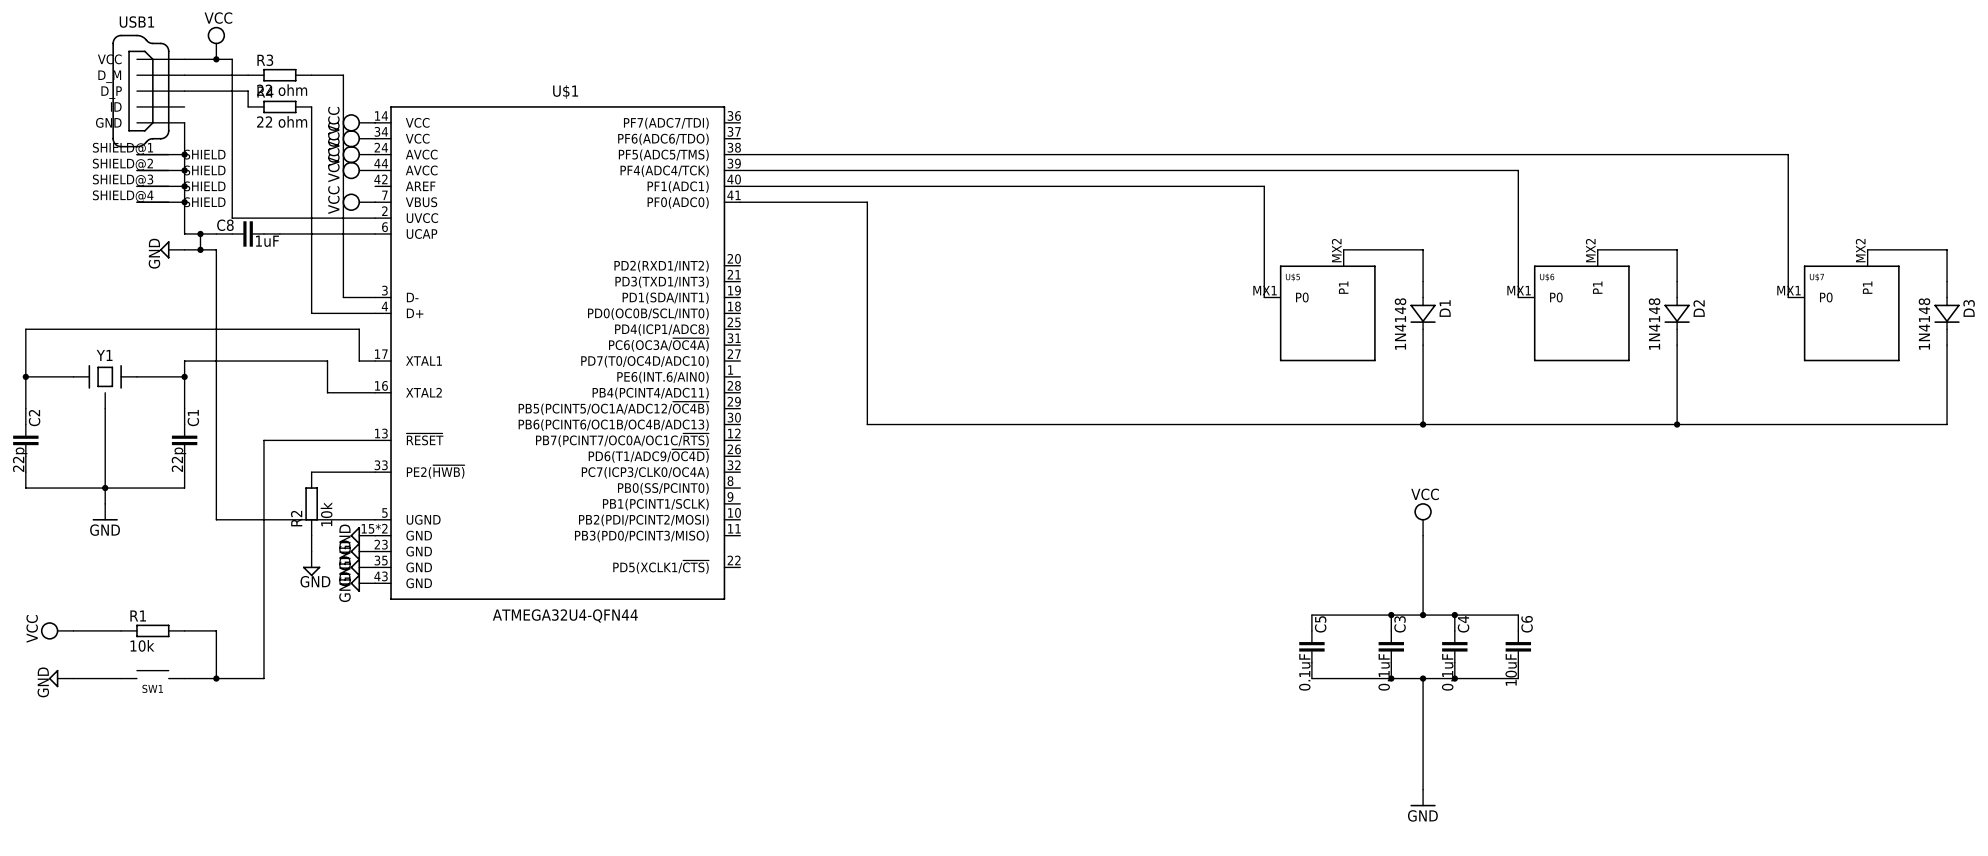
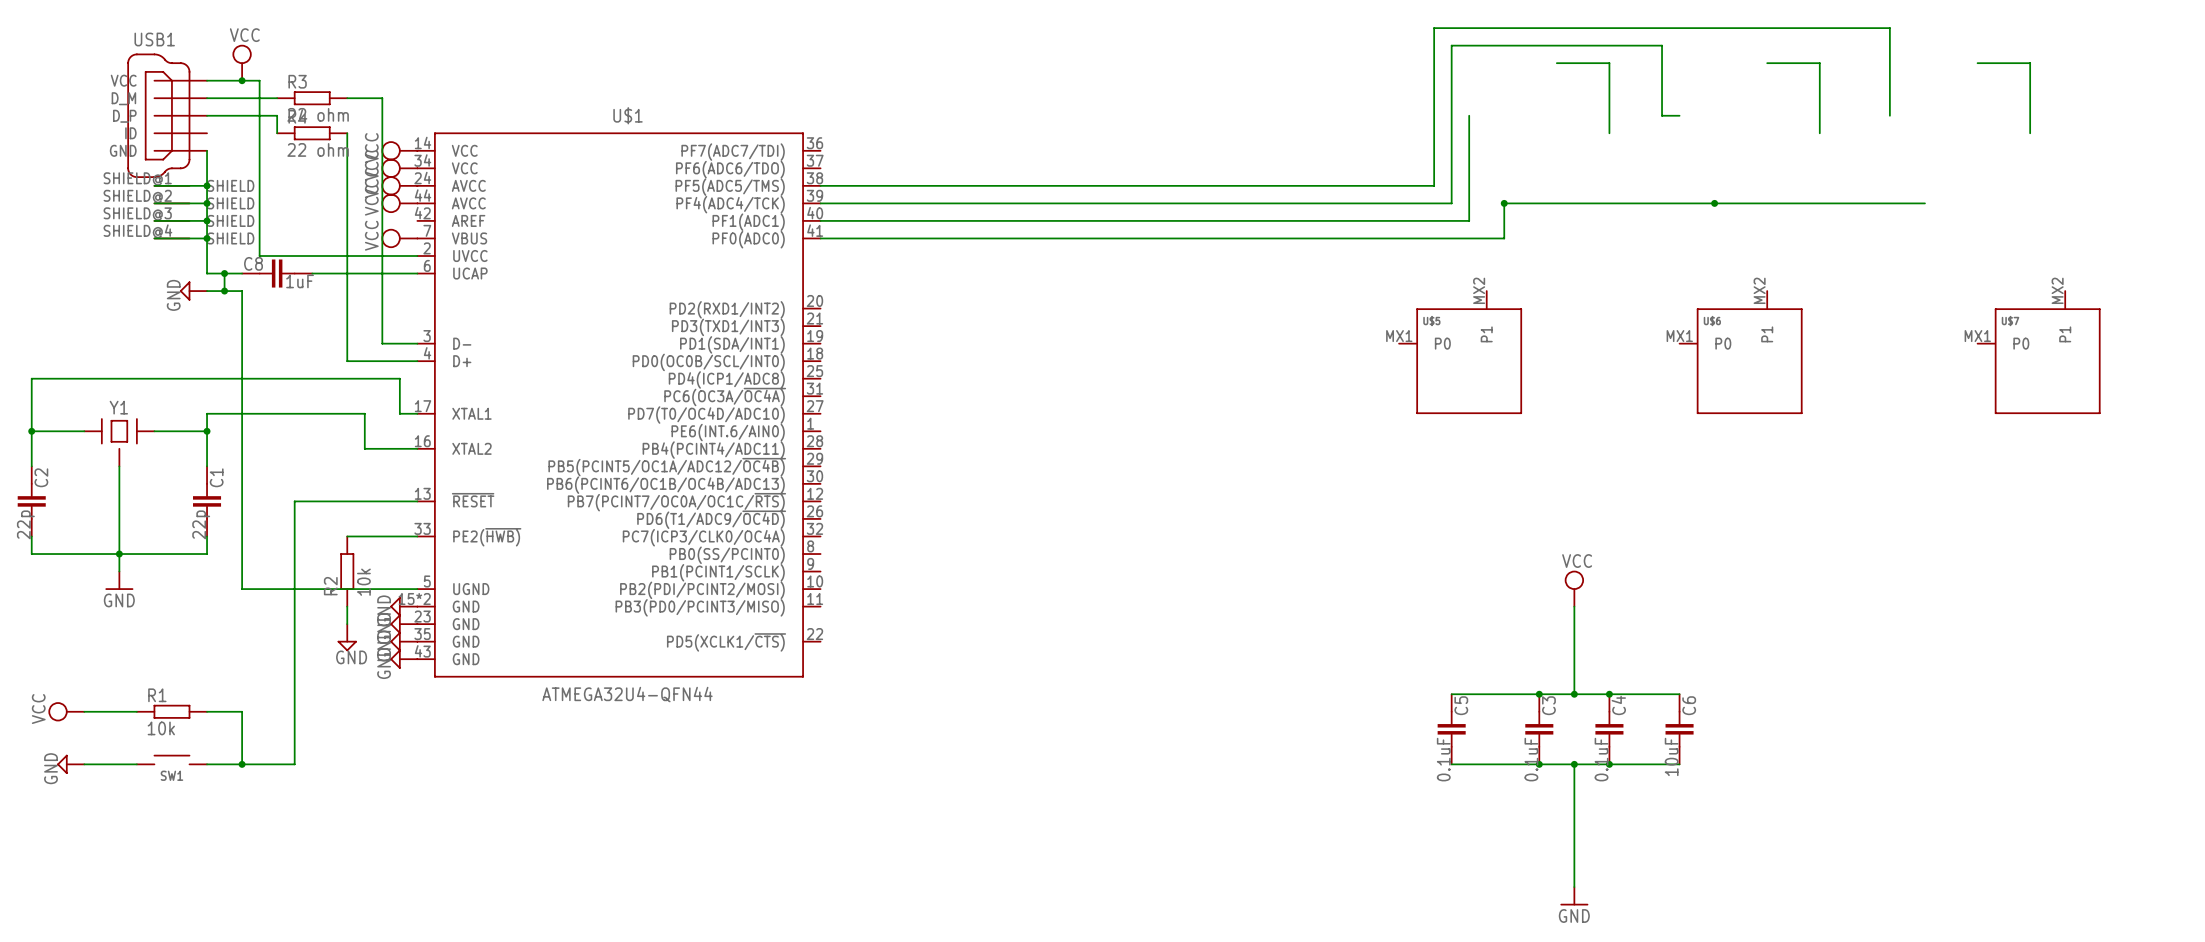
wire: none -> (1556, 63) (1609, 63) (1609, 133)
wire: none -> (1767, 63) (1819, 63) (1819, 133)
wire: none -> (1977, 63) (2030, 63) (2030, 133)
wire: (1296, 154) (1788, 154) (1788, 297) -> (1434, 185) (1434, 28) (1889, 28) (1889, 115)
wire: (1311, 170) (1359, 170) -> (1451, 203) (1451, 45) (1662, 45) (1662, 115) (1679, 115)
junction: none -> (1504, 203)
wire: (1518, 170) (1518, 297) -> (1679, 203) (1924, 203)
junction: none -> (1714, 203)
wire: (1264, 186) (1264, 297) -> (1399, 220) (1469, 220) (1469, 115)
wire: (867, 202) (867, 424) (1947, 424) (1947, 345) -> (960, 238) (1504, 238) (1504, 203)
wire: (1343, 249) (1423, 249) (1423, 281) -> none
wire: (1597, 249) (1677, 249) (1677, 281) -> none
wire: (1867, 249) (1947, 249) (1947, 281) -> none
D1: 1N4148 (1423, 313) -> none
D2: 1N4148 (1677, 313) -> none
D3: 1N4148 (1947, 313) -> none
wire: (1423, 345) (1423, 424) -> none
wire: (1677, 345) (1677, 424) -> none
junction: (1423, 424) -> none
junction: (1677, 424) -> none

